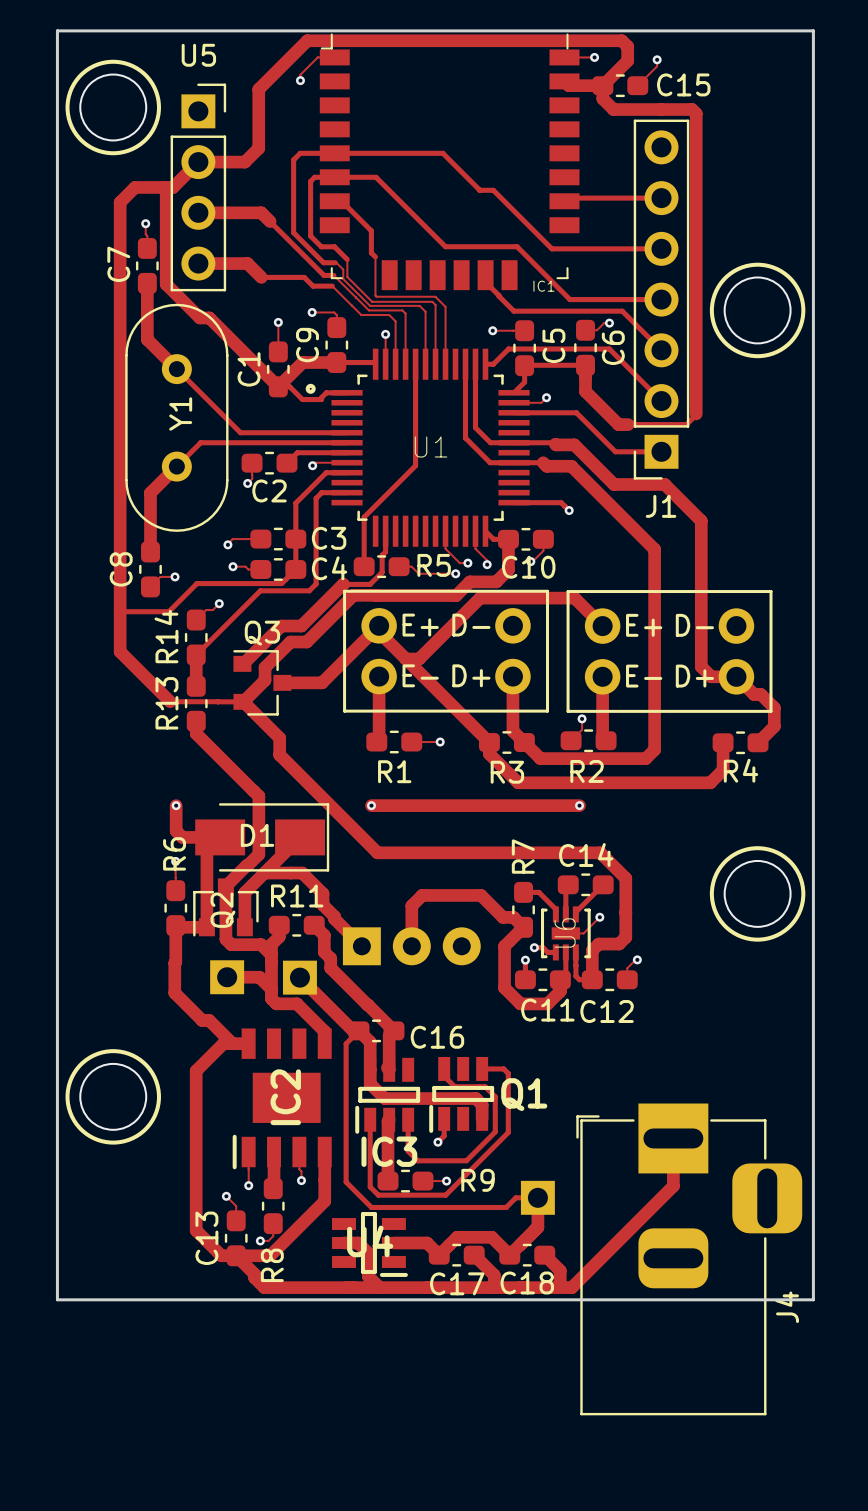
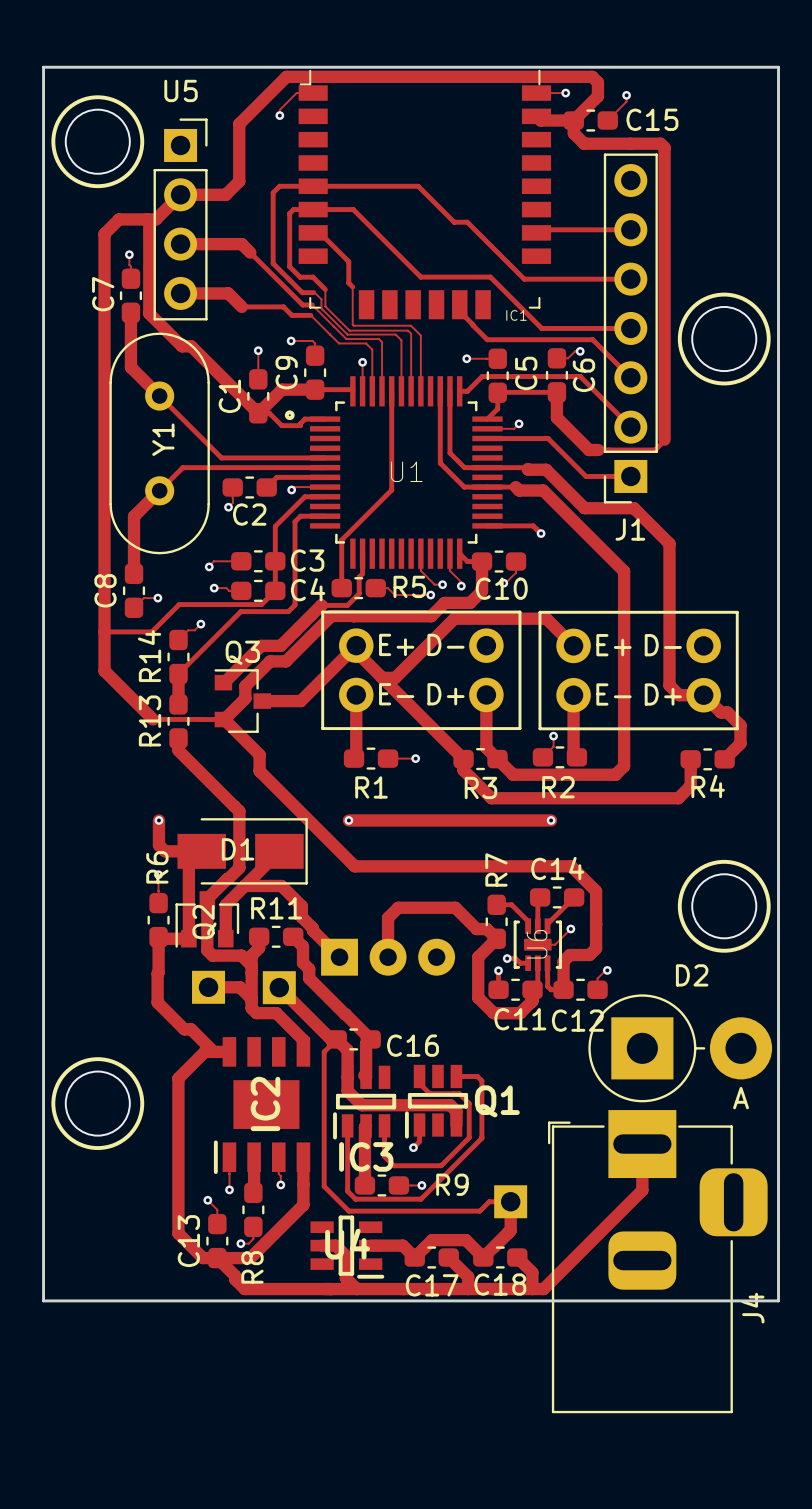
D2: none -> (680, 1048)

